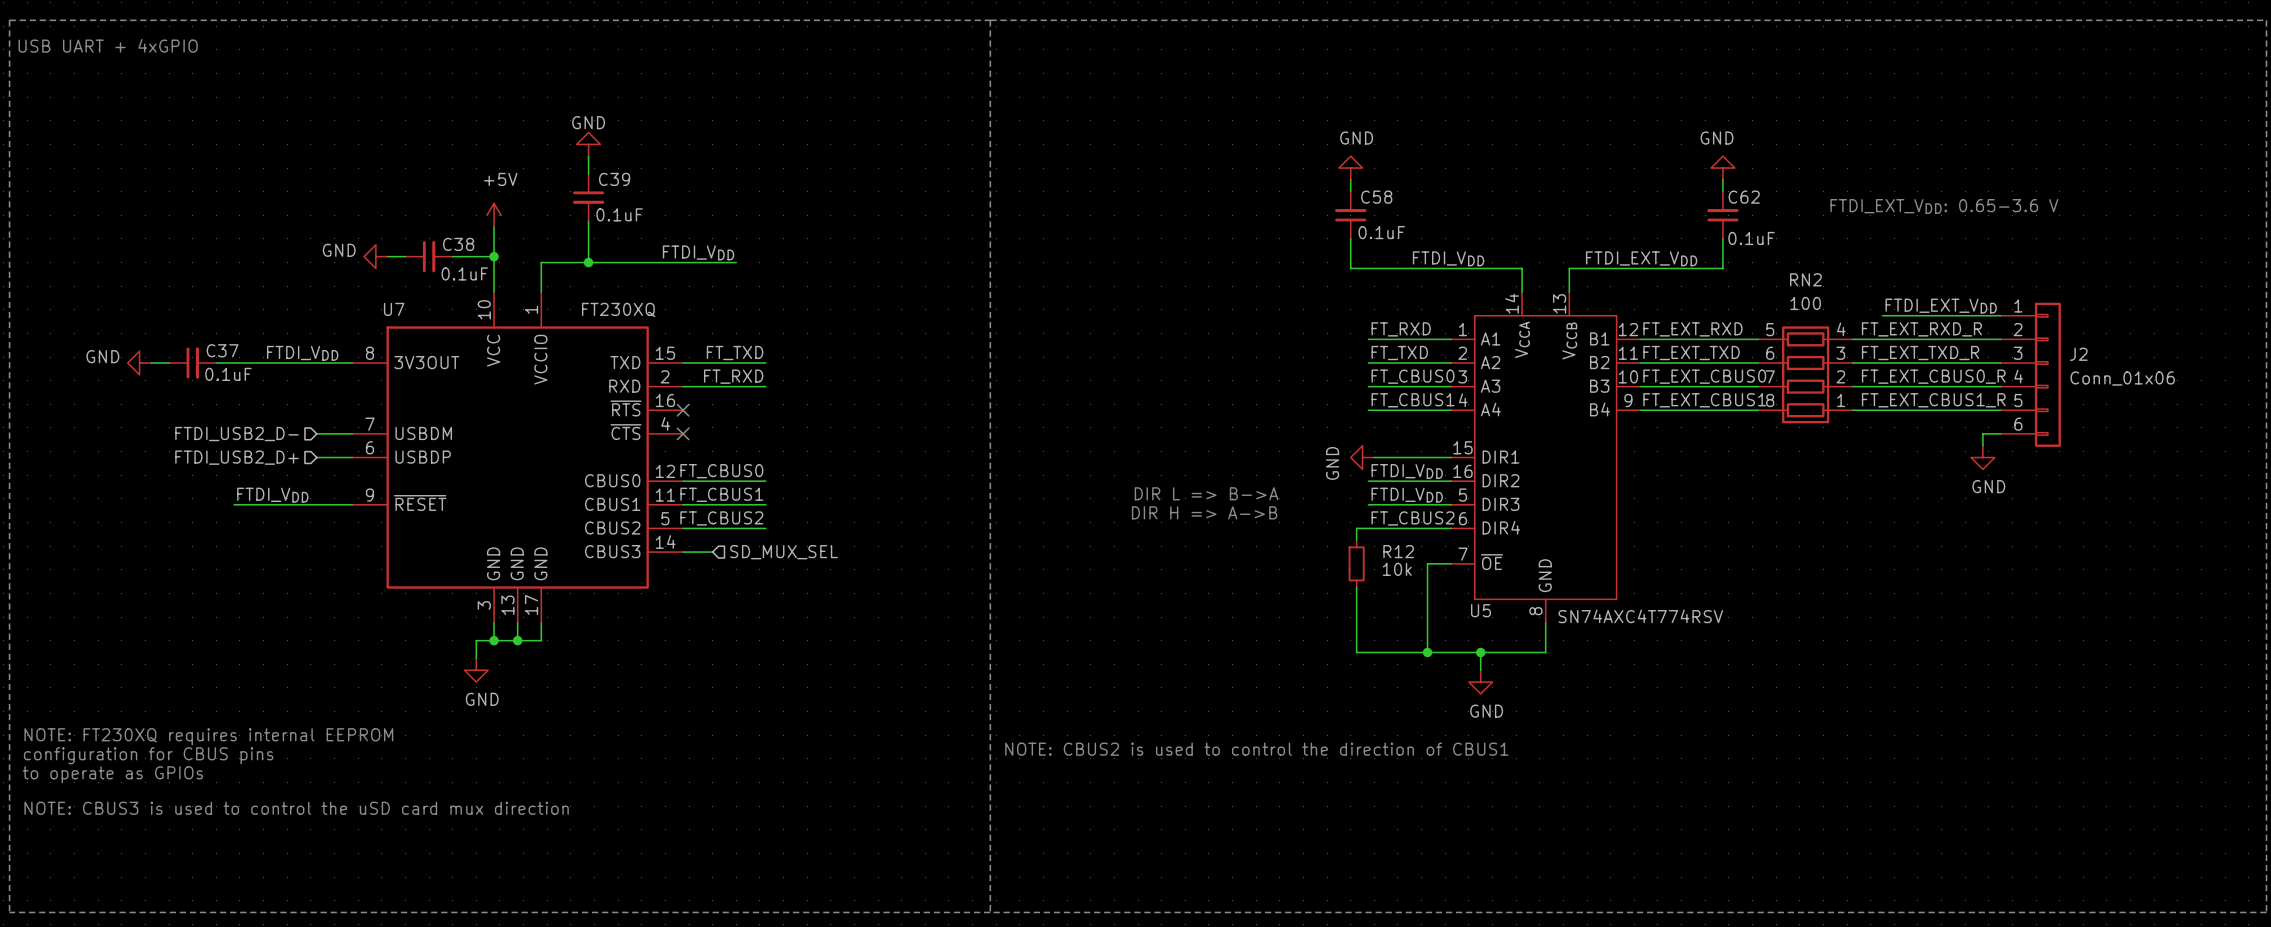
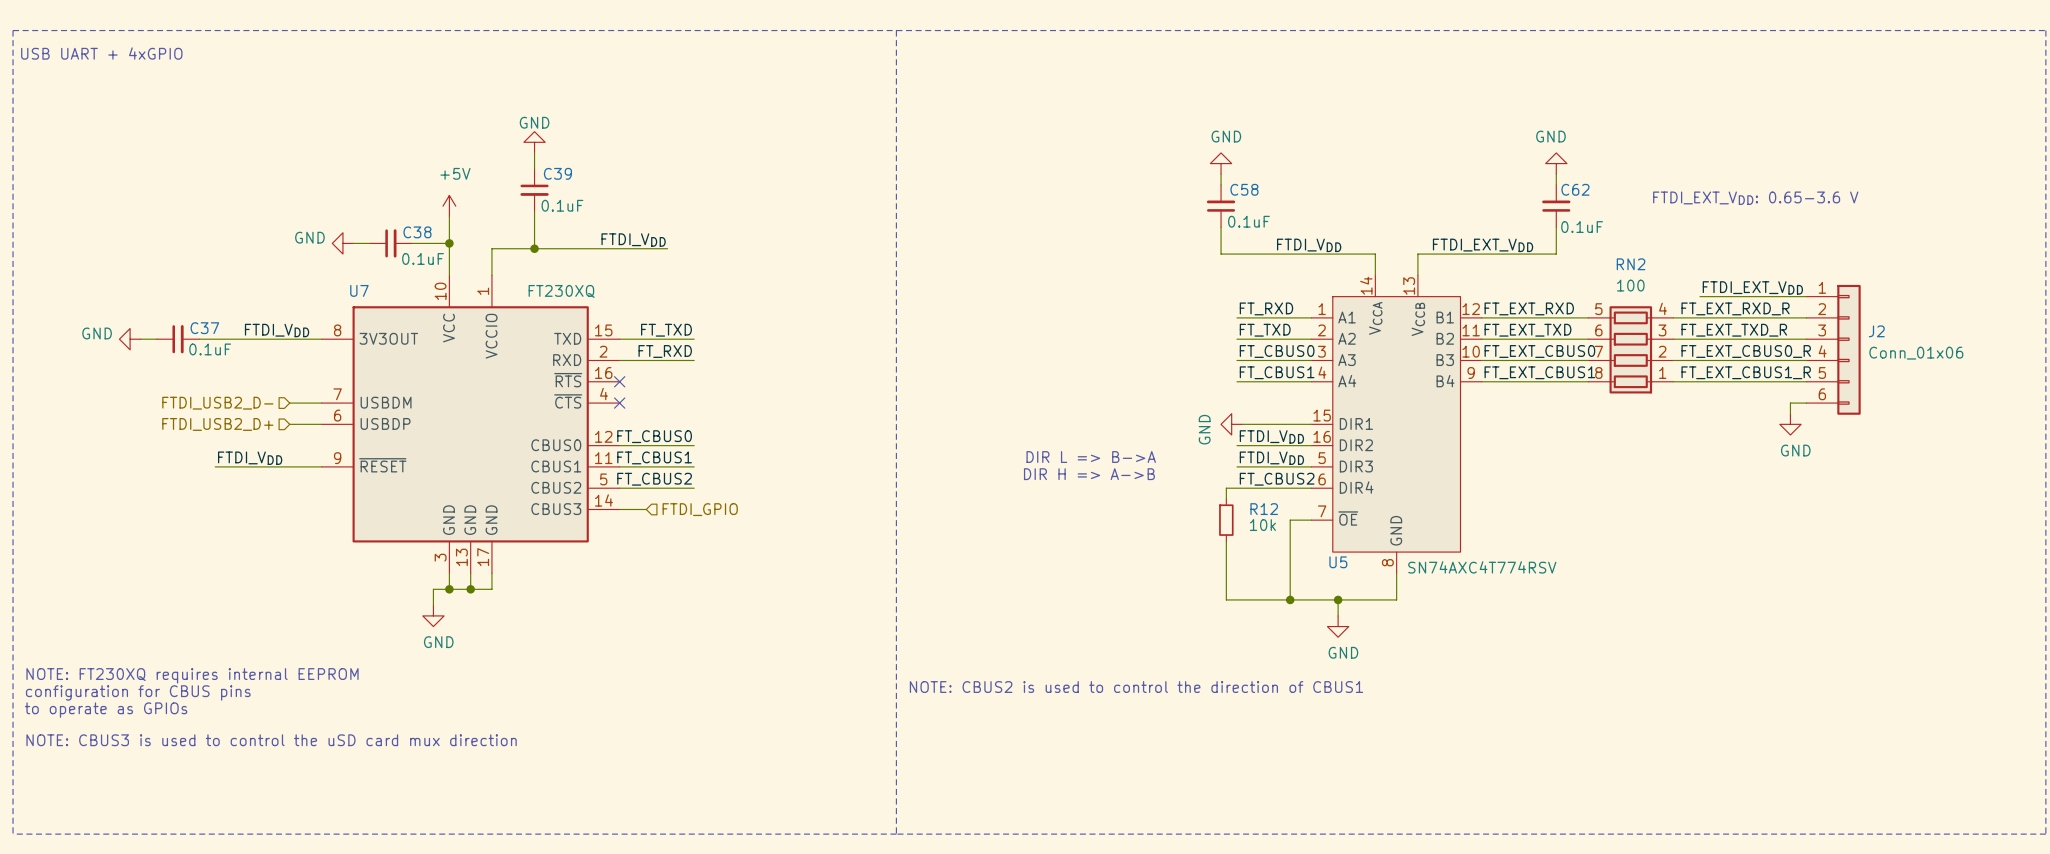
hierarchical label: SD_MUX_SEL (784, 552) -> FTDI_GPIO (700, 509)

